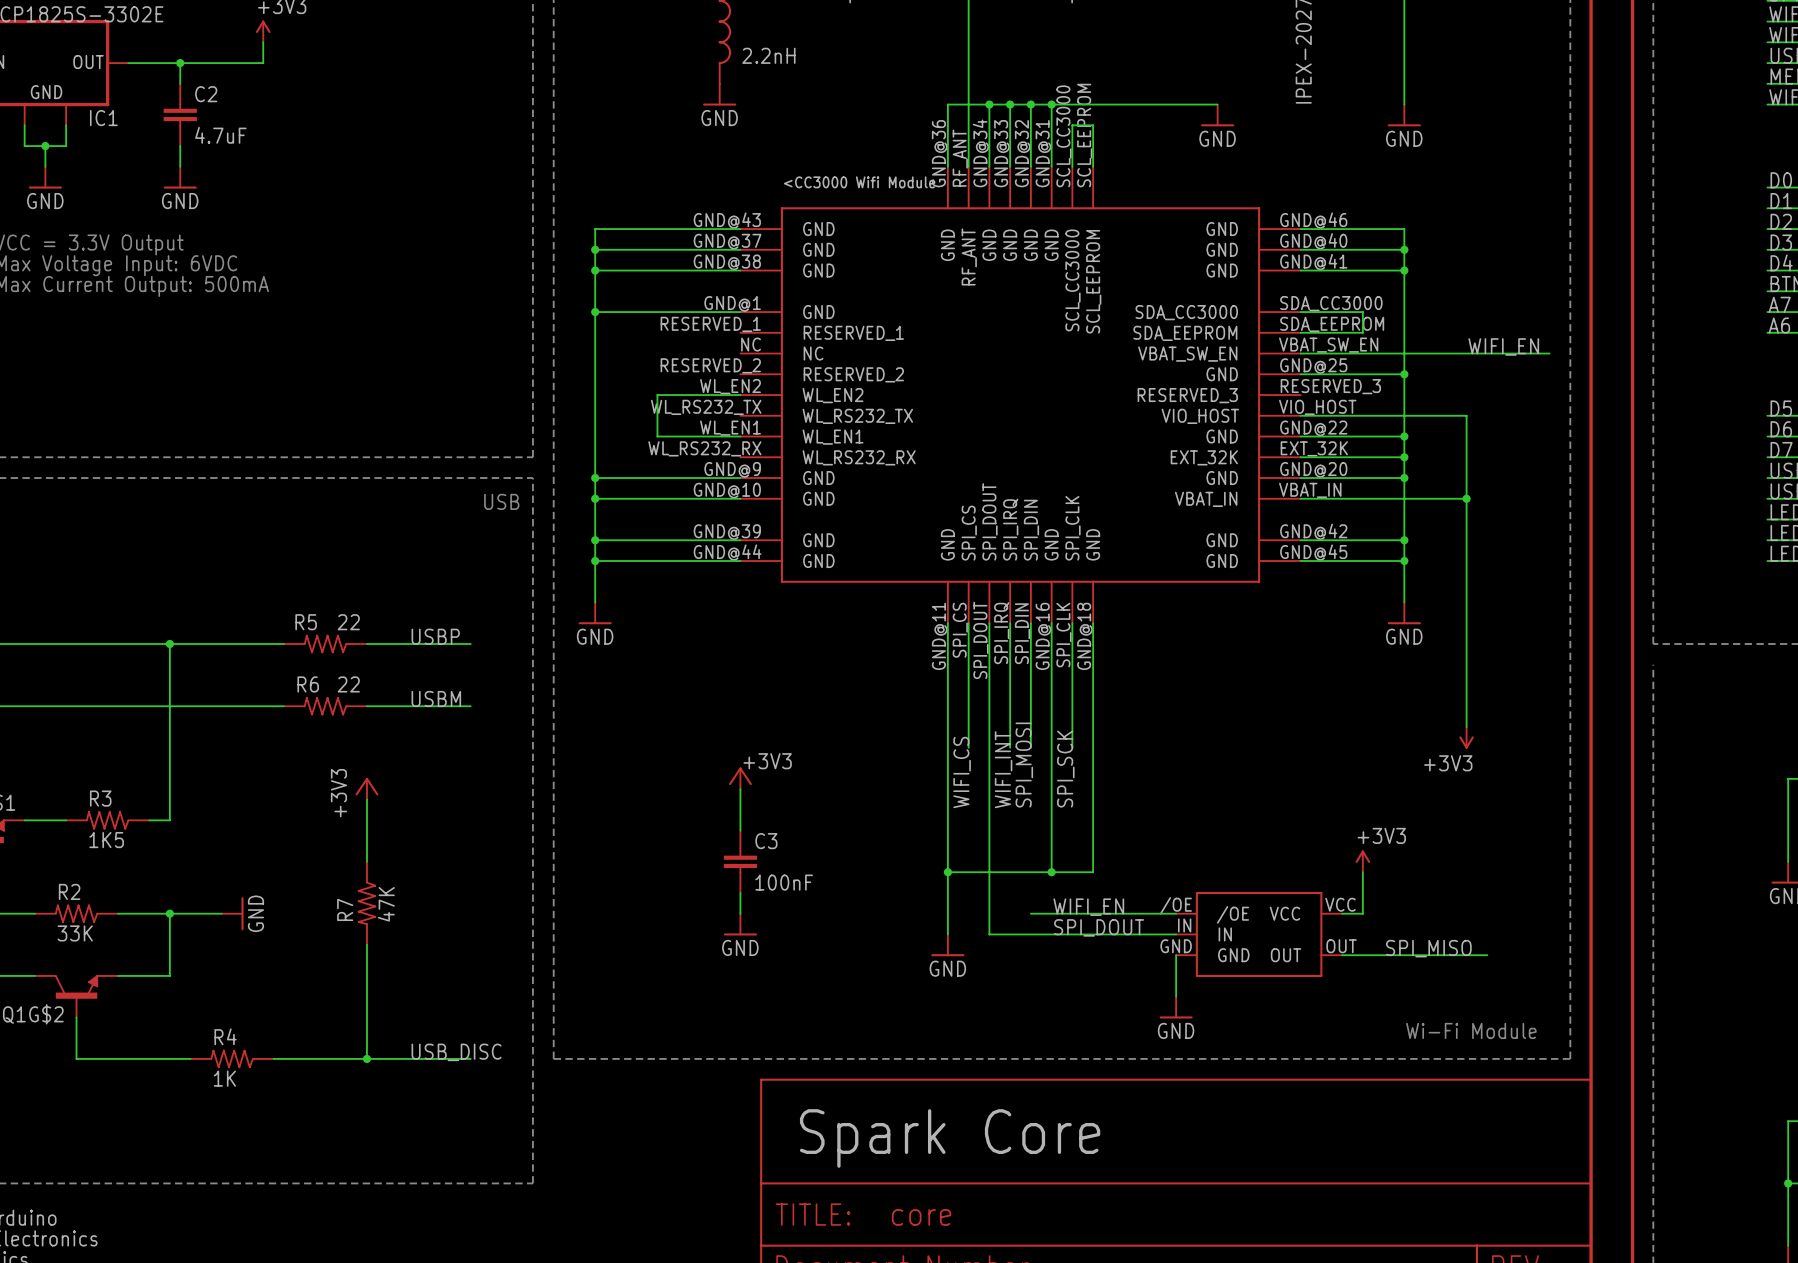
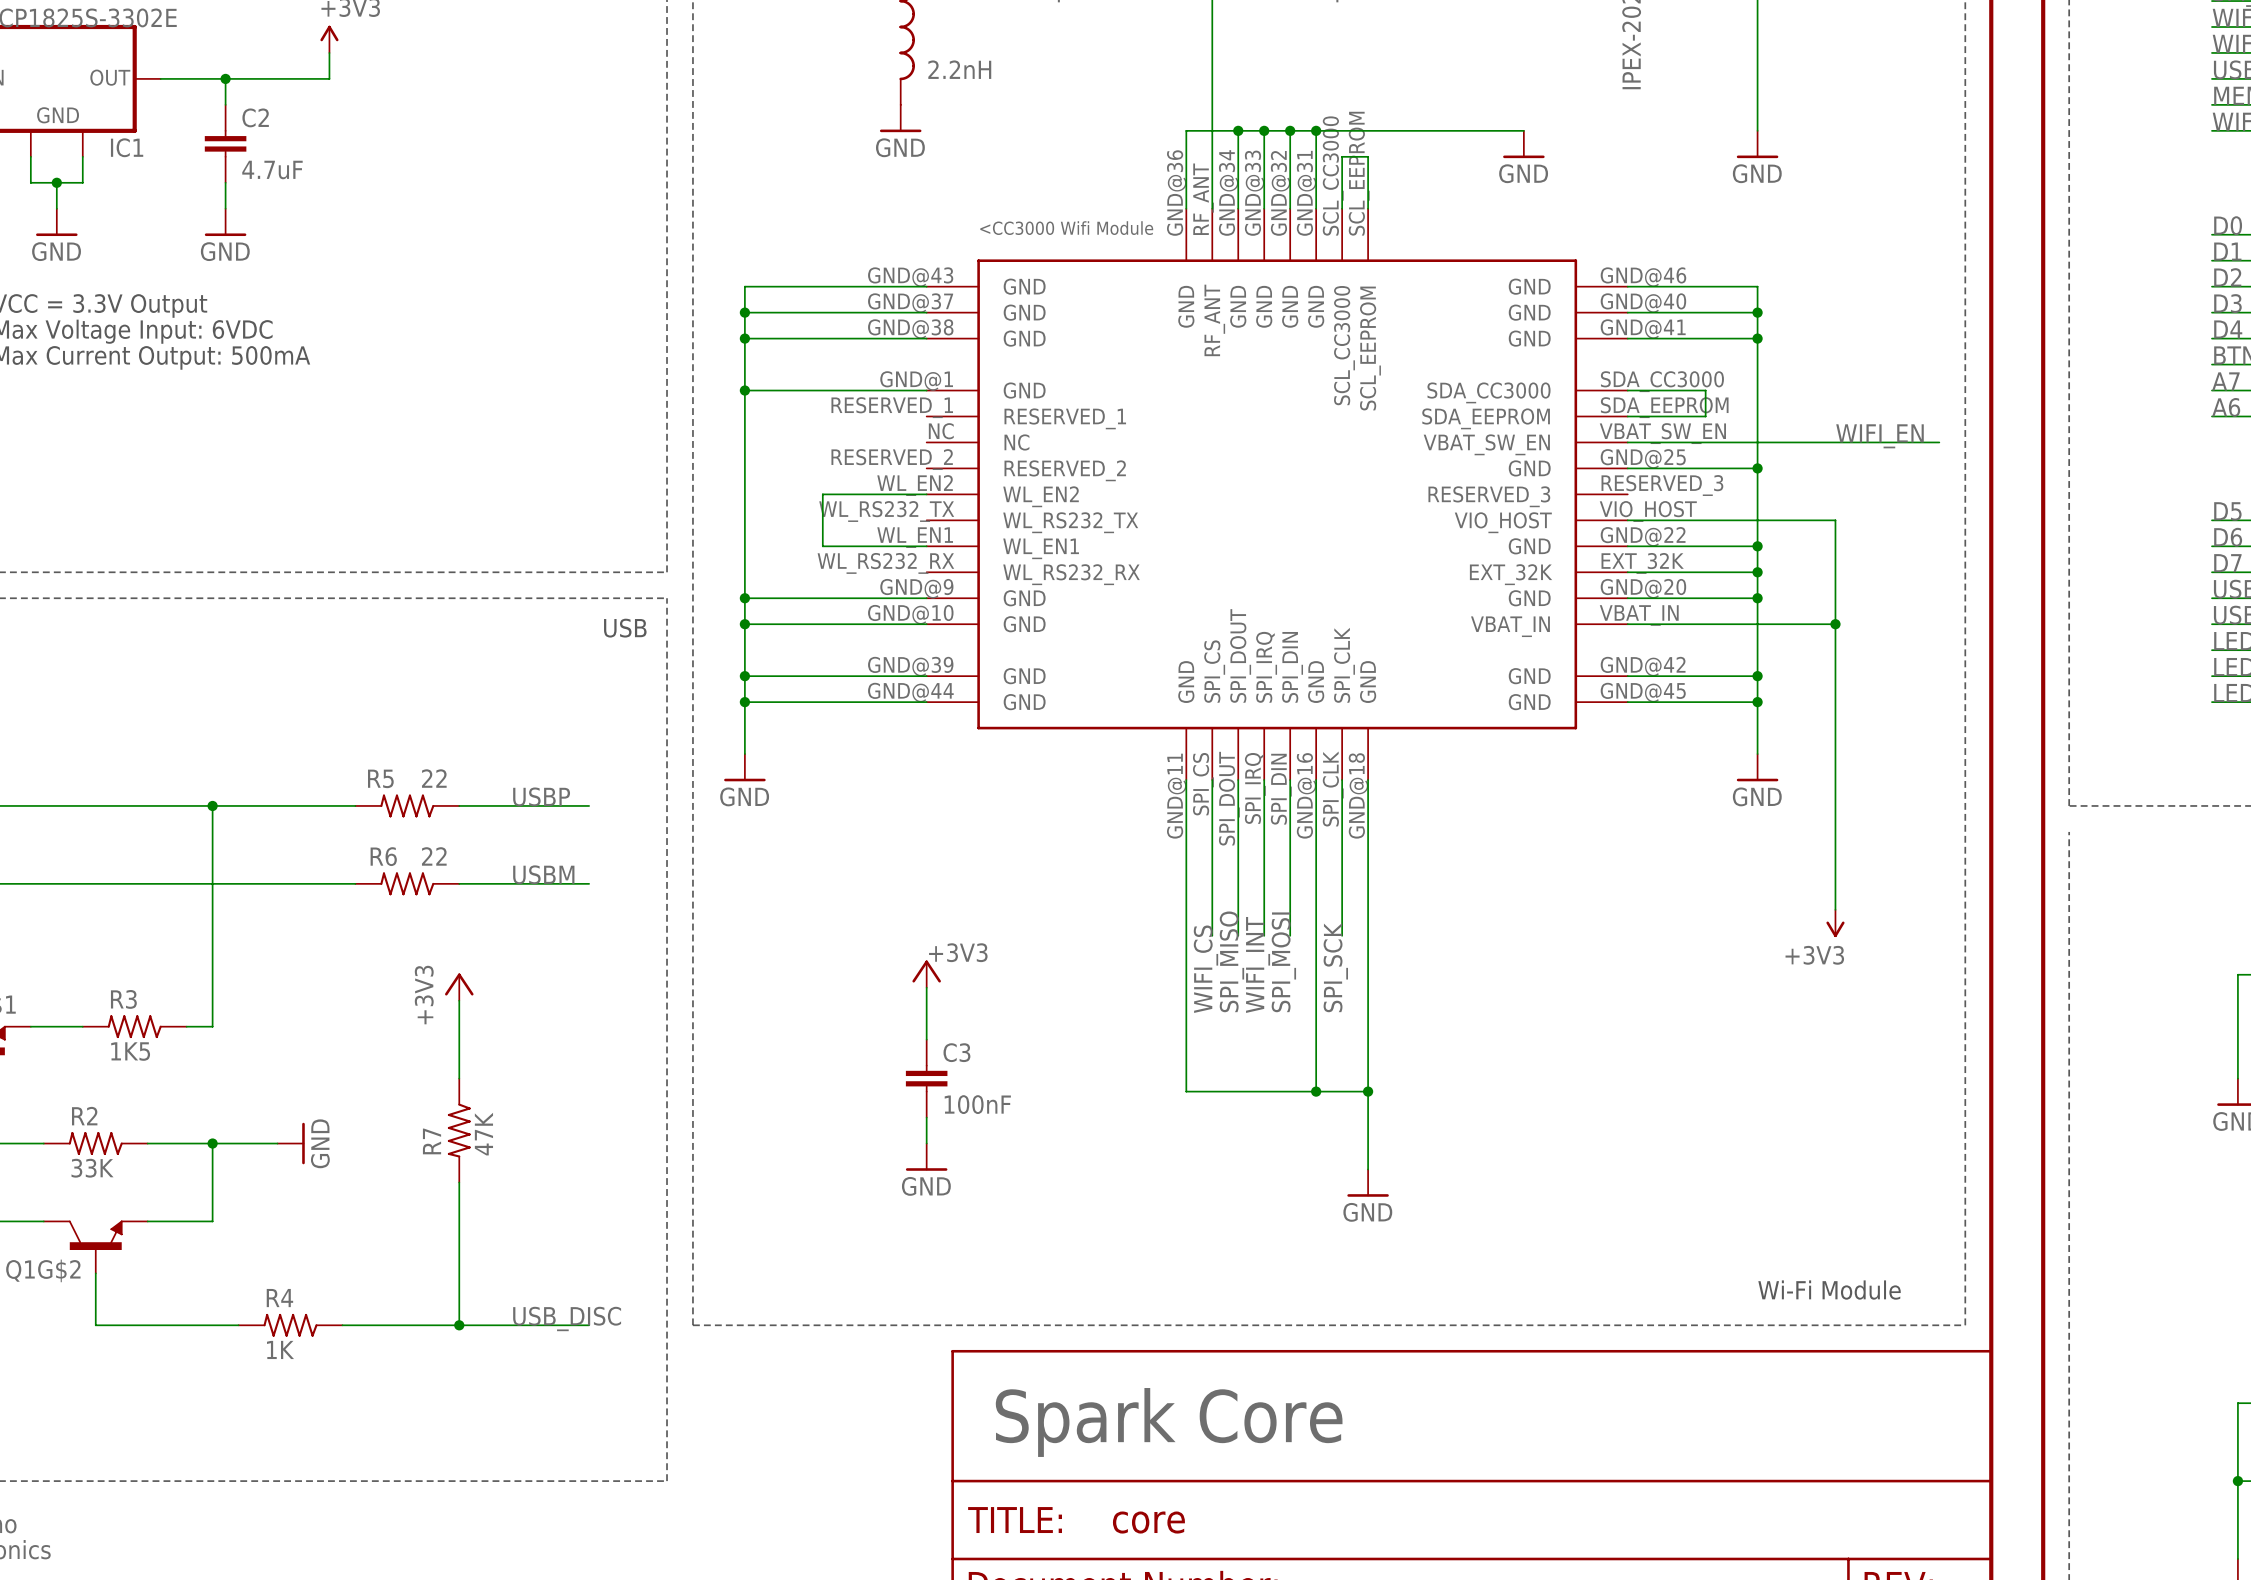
wire: (989, 747) (989, 934) (1176, 934) -> none
label: none -> SPI_MISO (1231, 961)
power symbol: +3V3 (1362, 861) -> none
wire: (947, 872) (947, 934) -> (1368, 1091) (1368, 1169)
junction: (947, 872) -> none
junction: none -> (1368, 1091)
wire: (1362, 872) (1362, 913) (1342, 913) -> none
label: WIFI_EN (1088, 907) -> none
wire: (1030, 913) (1176, 913) -> none
label: SPI_DOUT (1099, 927) -> none
part: (1259, 934) -> none
power symbol: GND (947, 945) -> none
power symbol: none -> GND (1368, 1183)
label: SPI_MISO (1428, 948) -> none
wire: (1176, 955) (1176, 996) -> none
wire: (1342, 955) (1487, 955) -> none
power symbol: GND (1176, 1007) -> none

